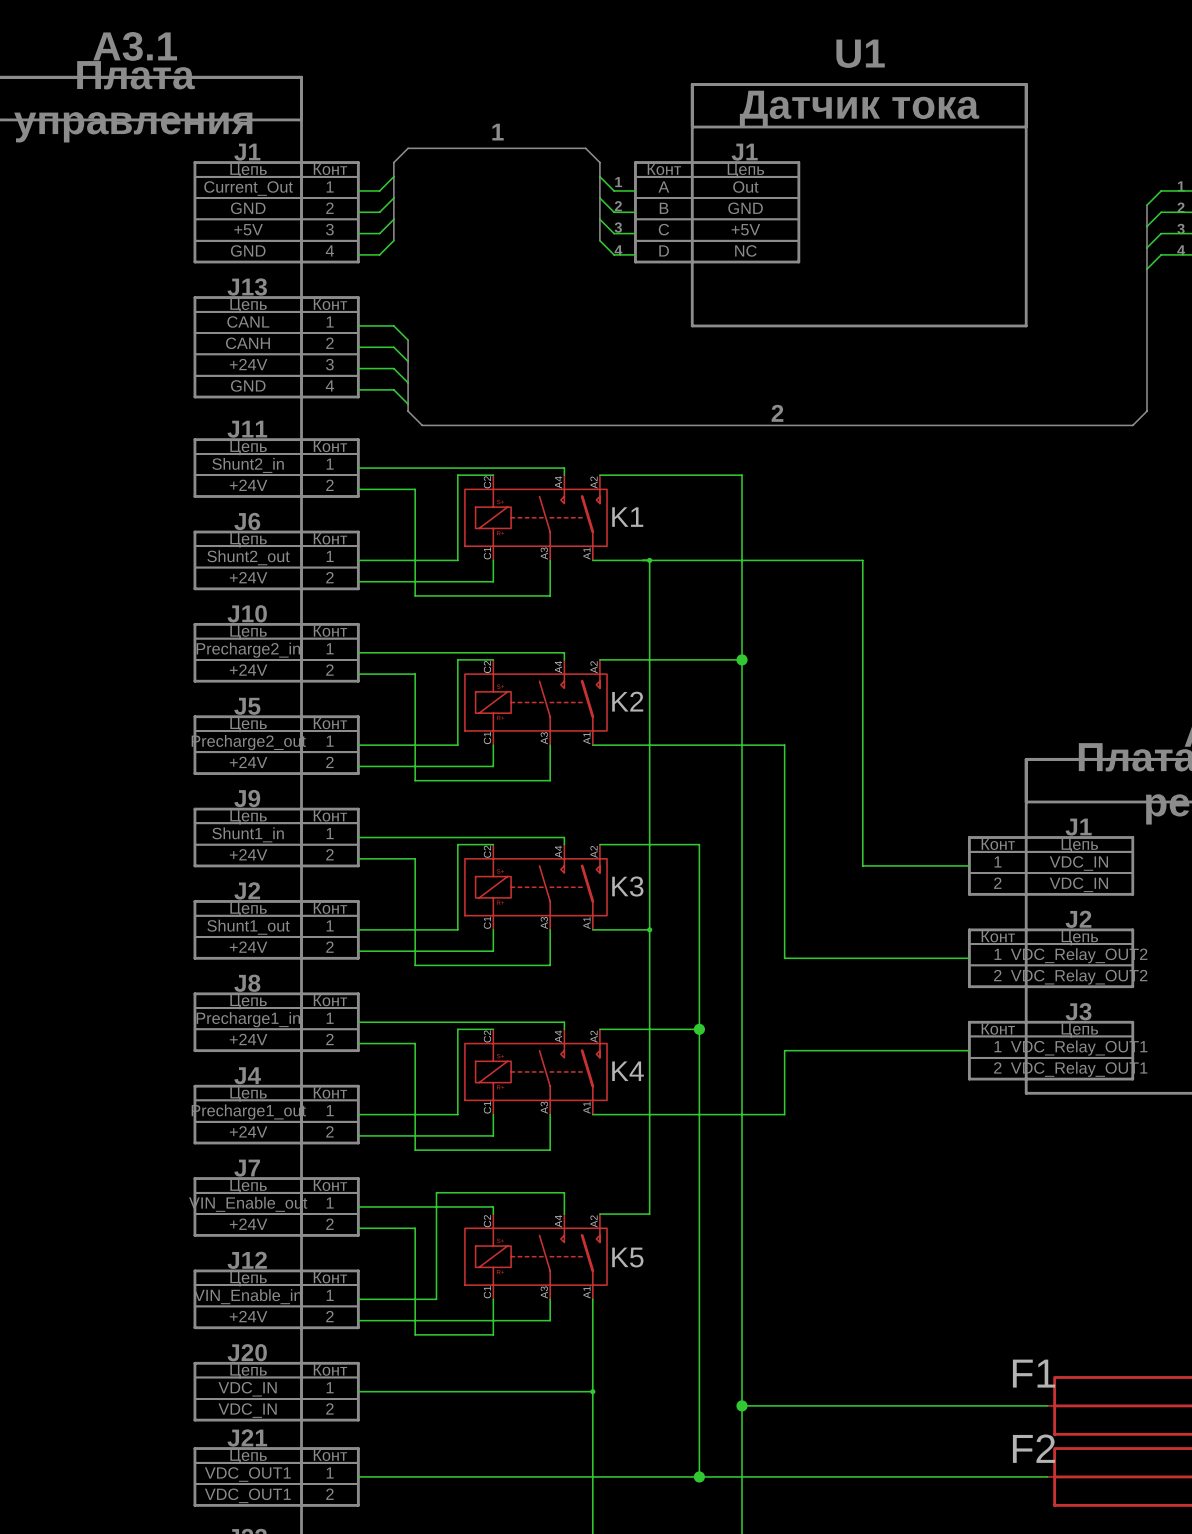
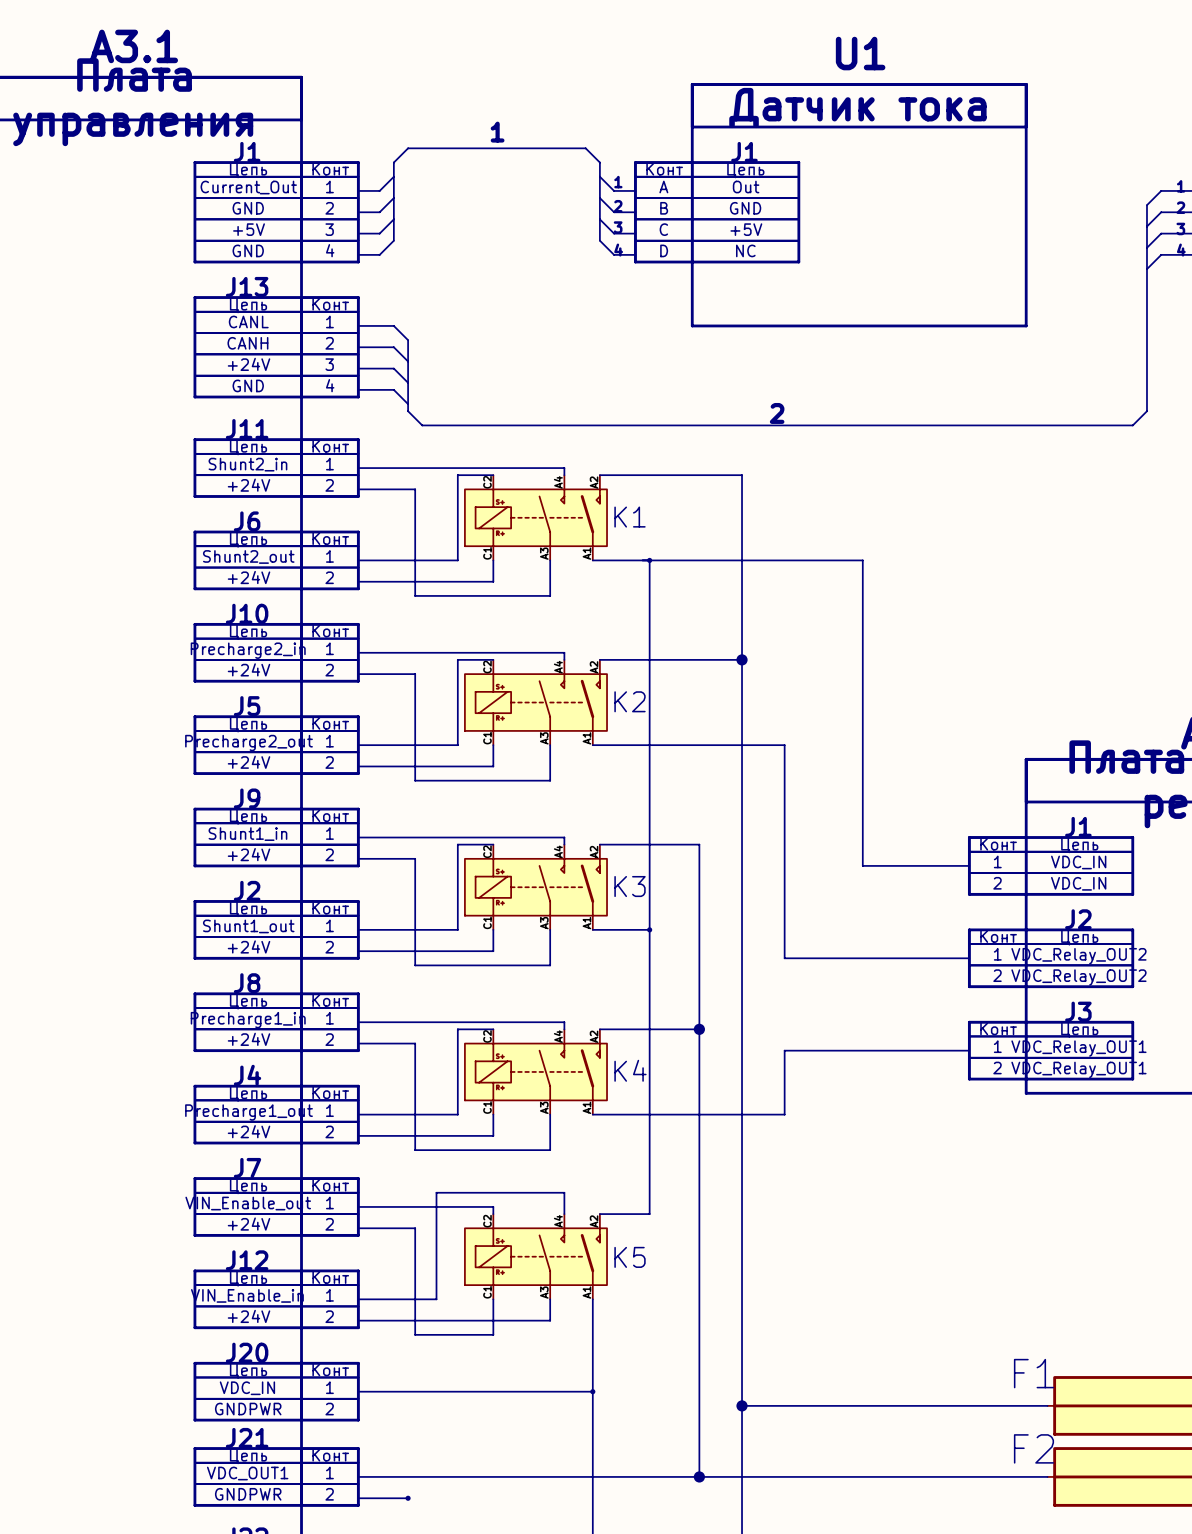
text: VDC_IN (247, 1410) -> GNDPWR (248, 1409)
text: VDC_OUT1 (247, 1495) -> GNDPWR (248, 1494)
wire: none -> (358, 1498) (408, 1498)
junction: none -> (408, 1498)

